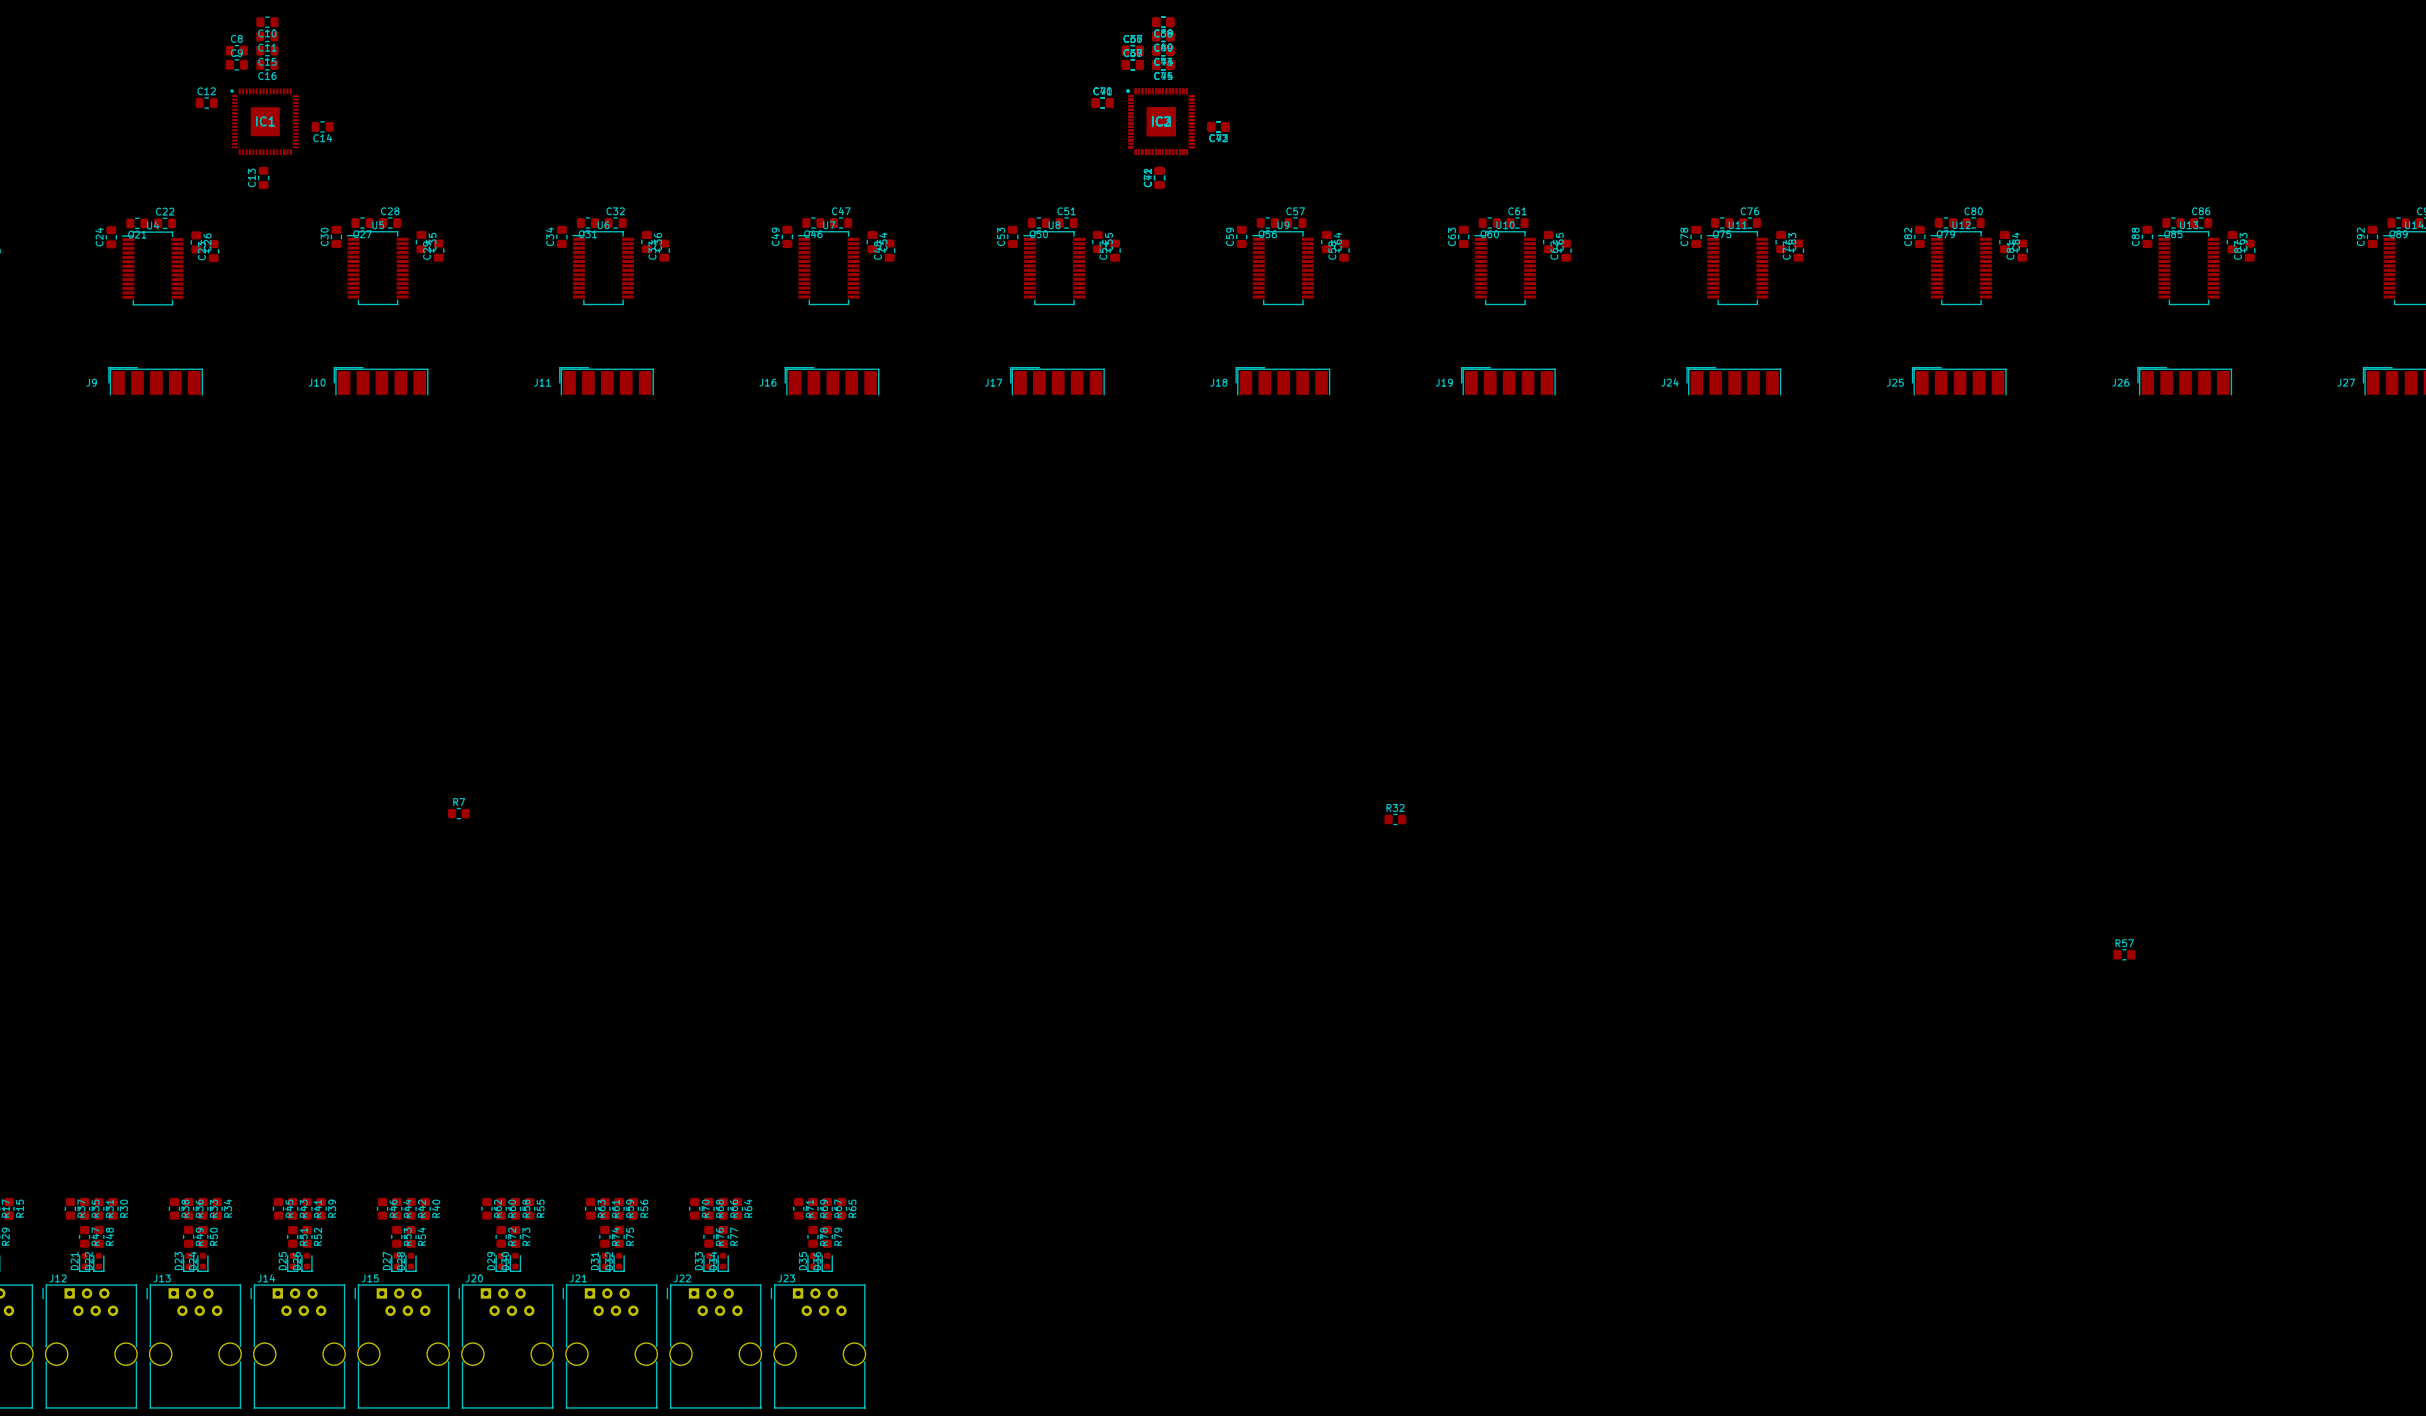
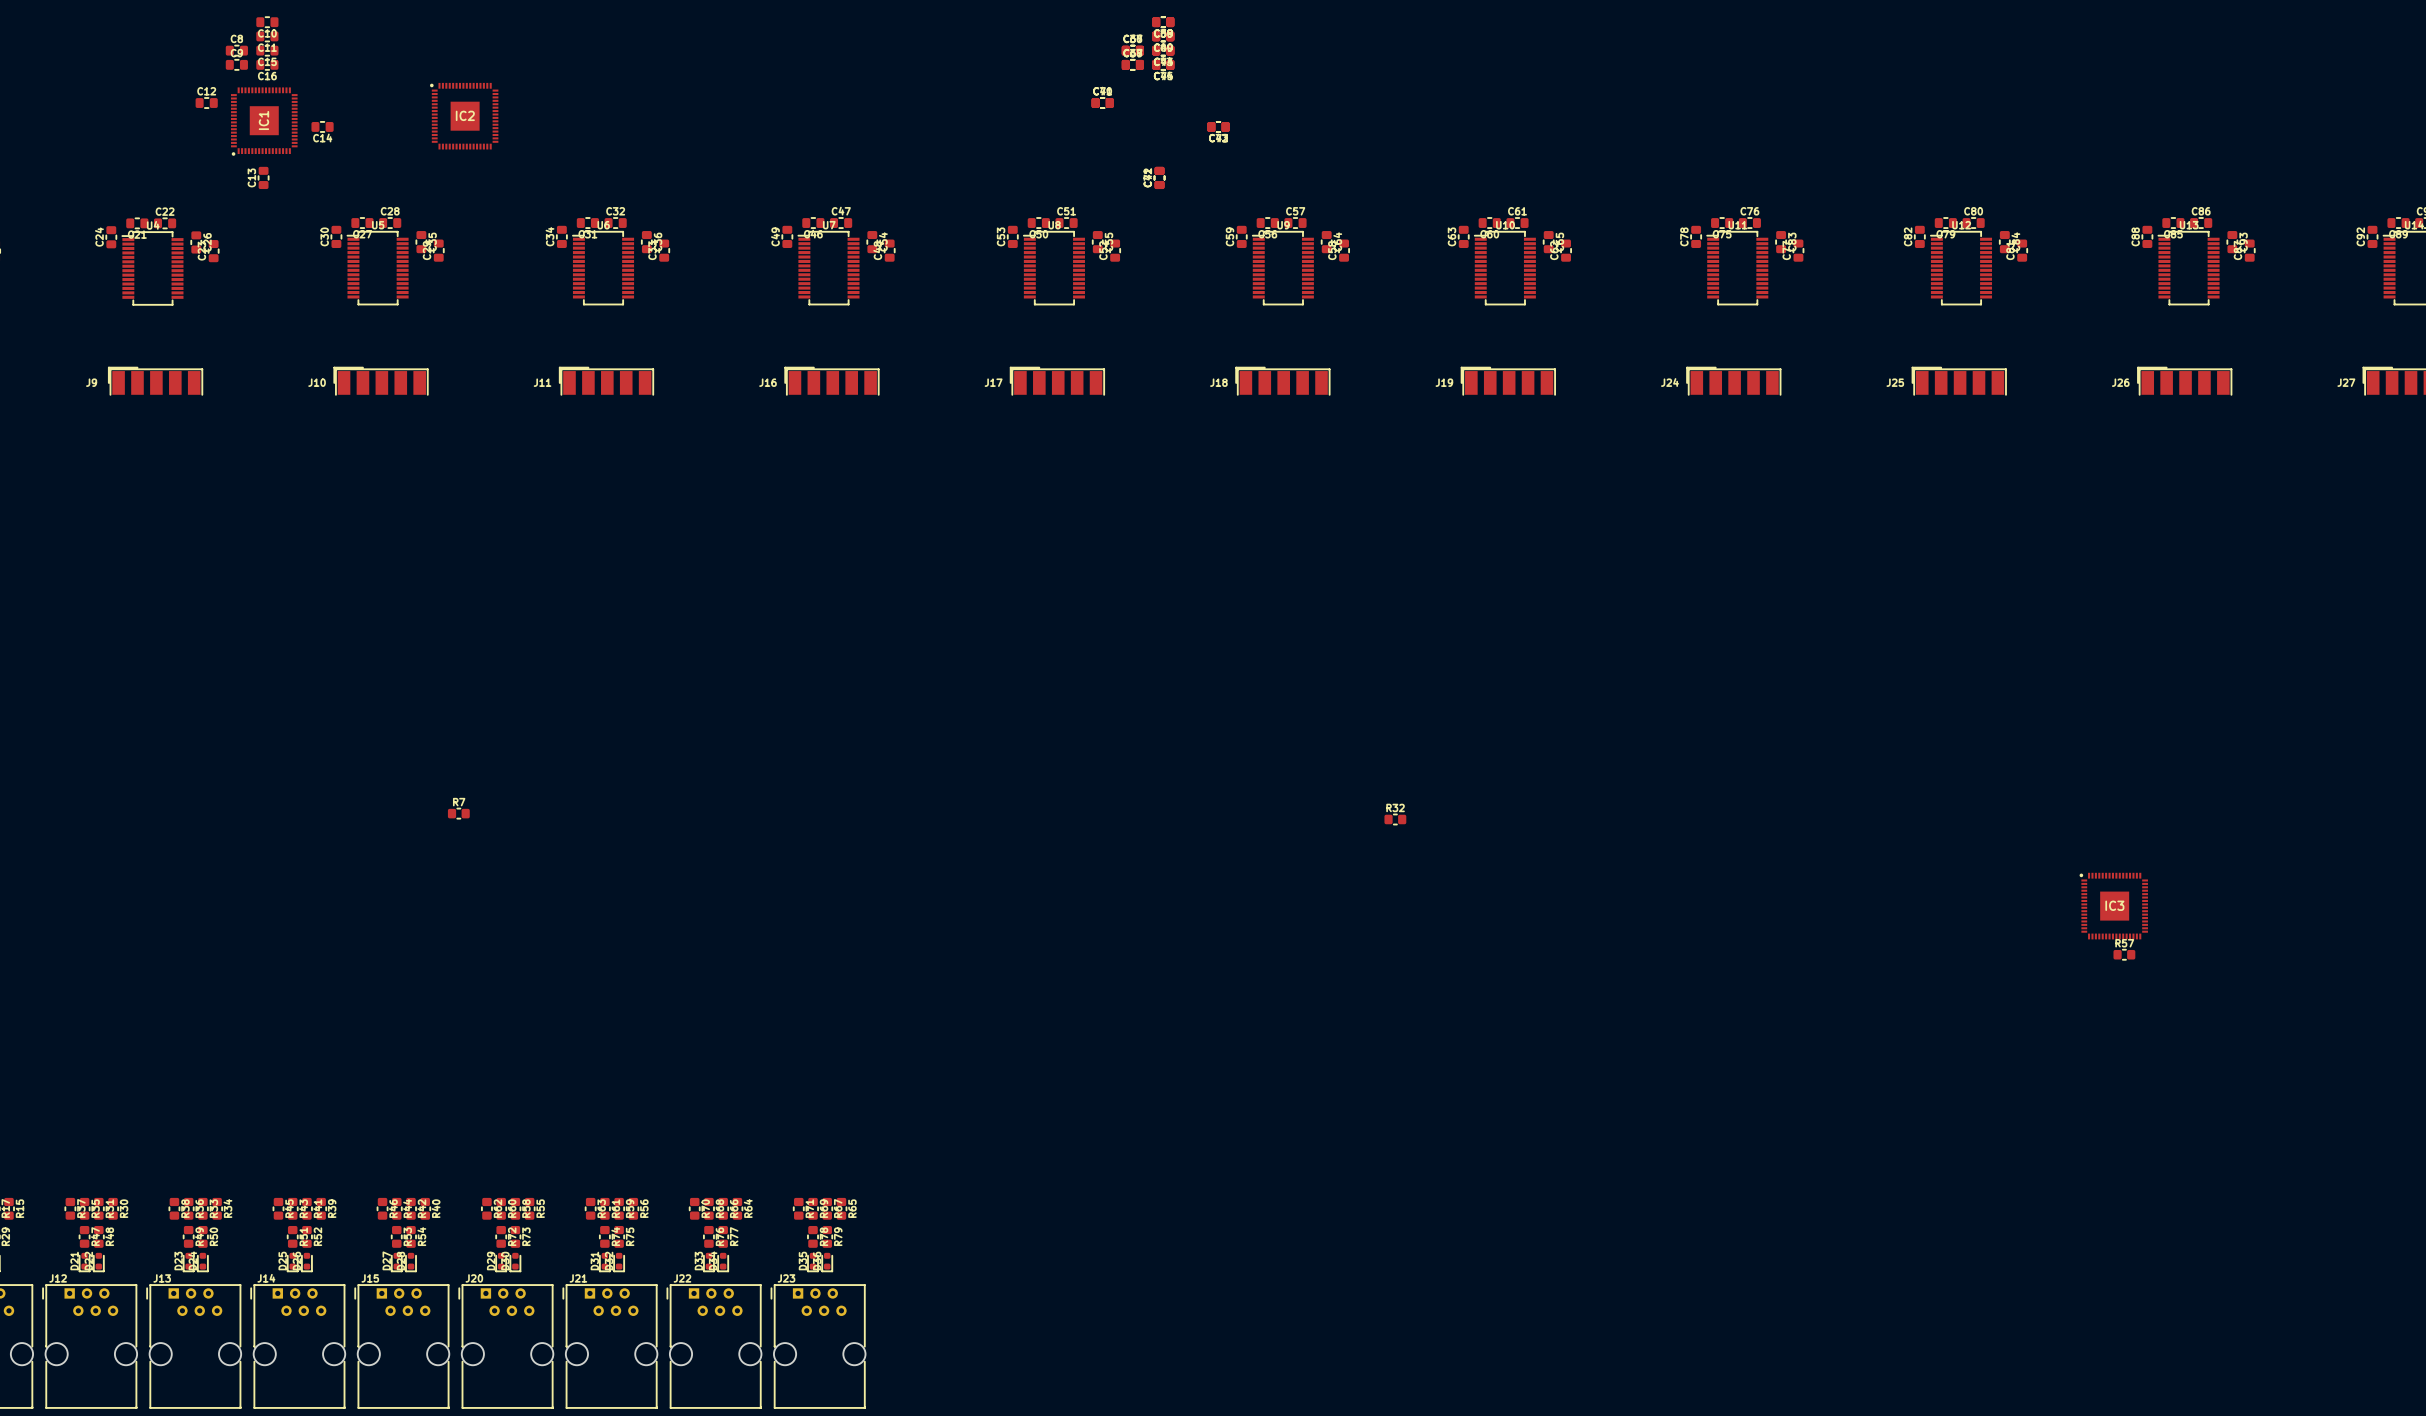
IC1 rotation: 0° (264, 121) -> 90° counterclockwise (264, 121)
IC2 position: (1160, 121) -> (464, 116)
IC3 position: (1160, 121) -> (2113, 906)

